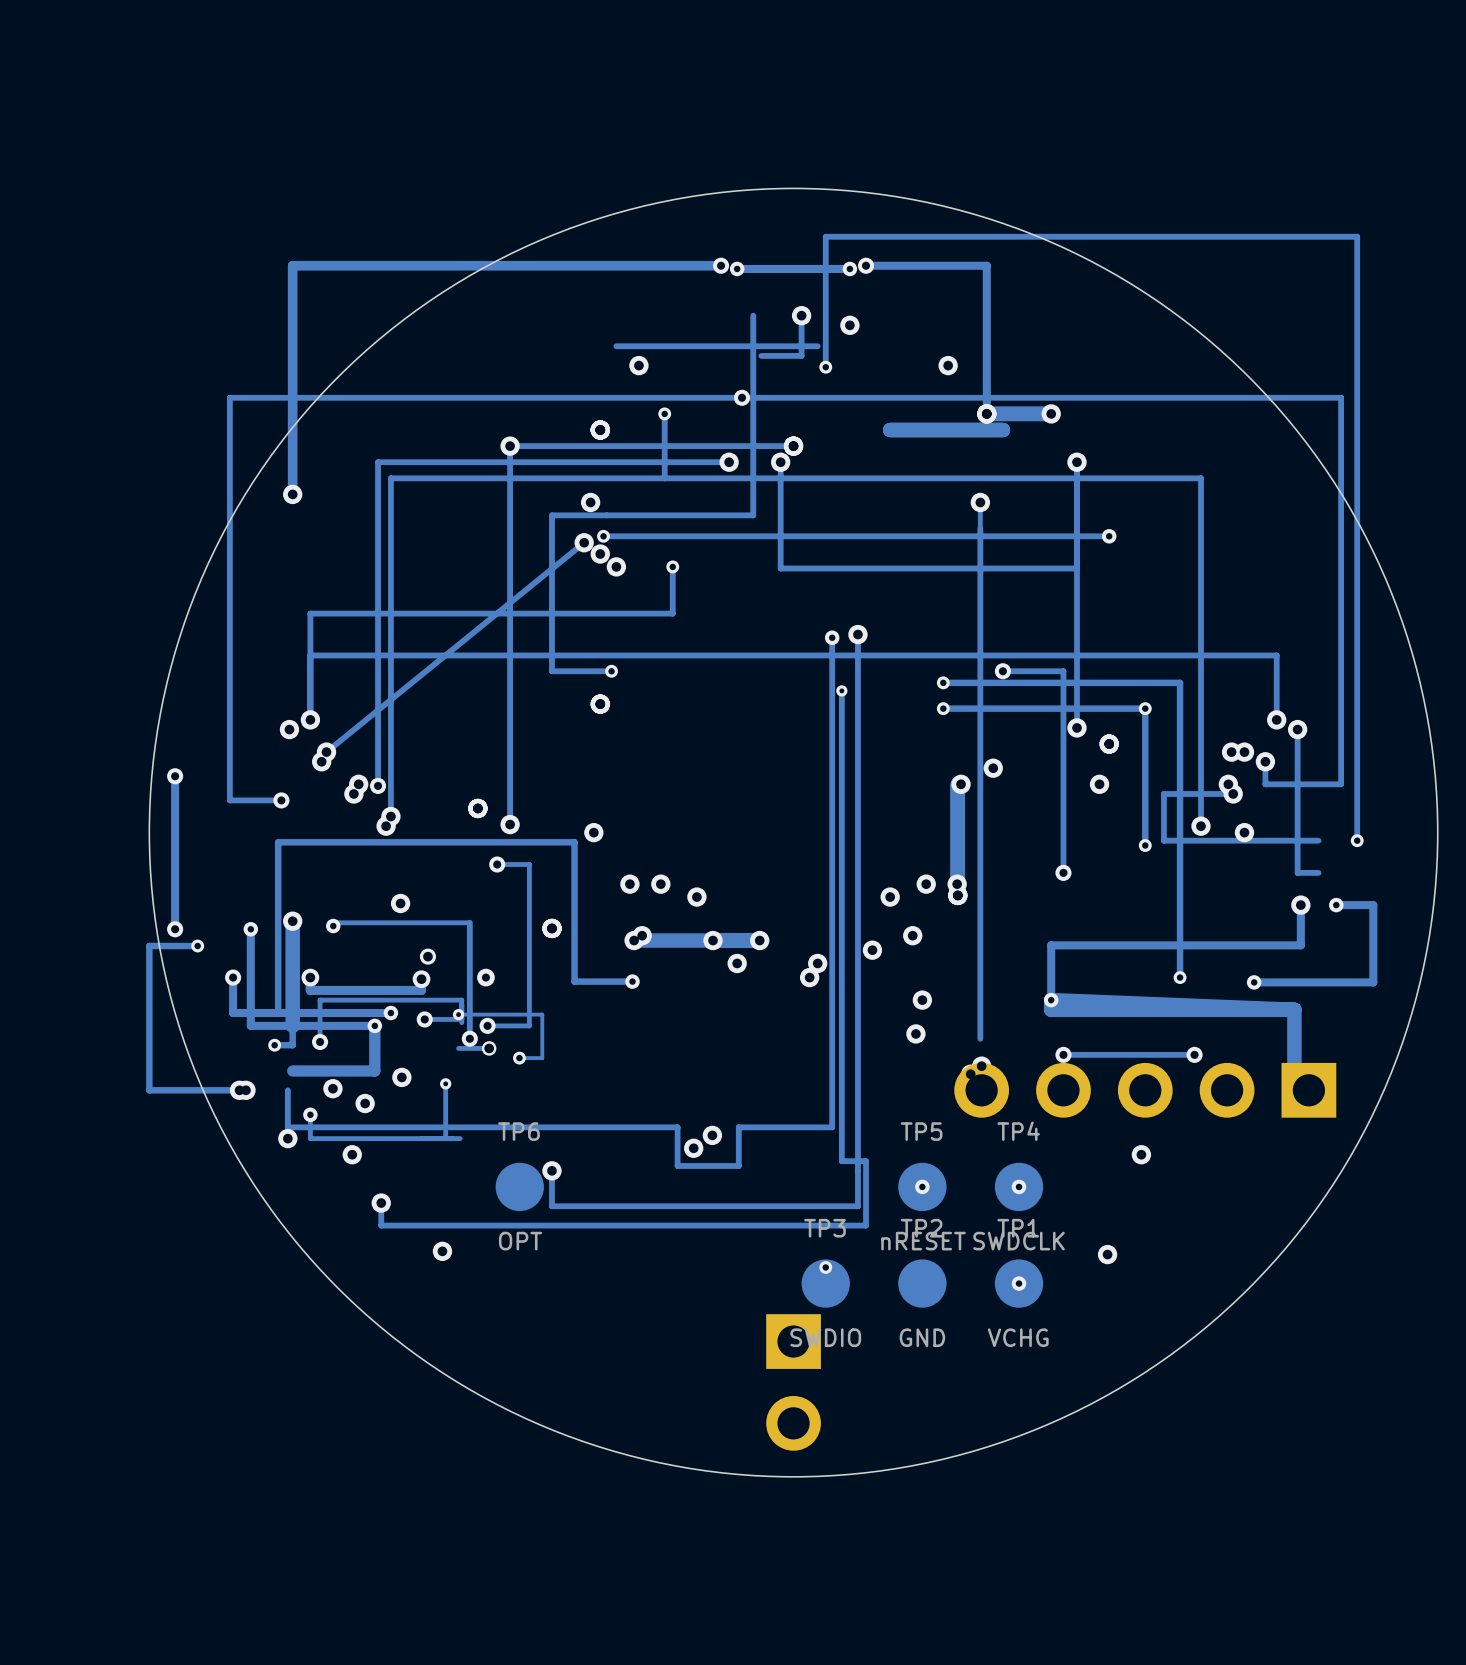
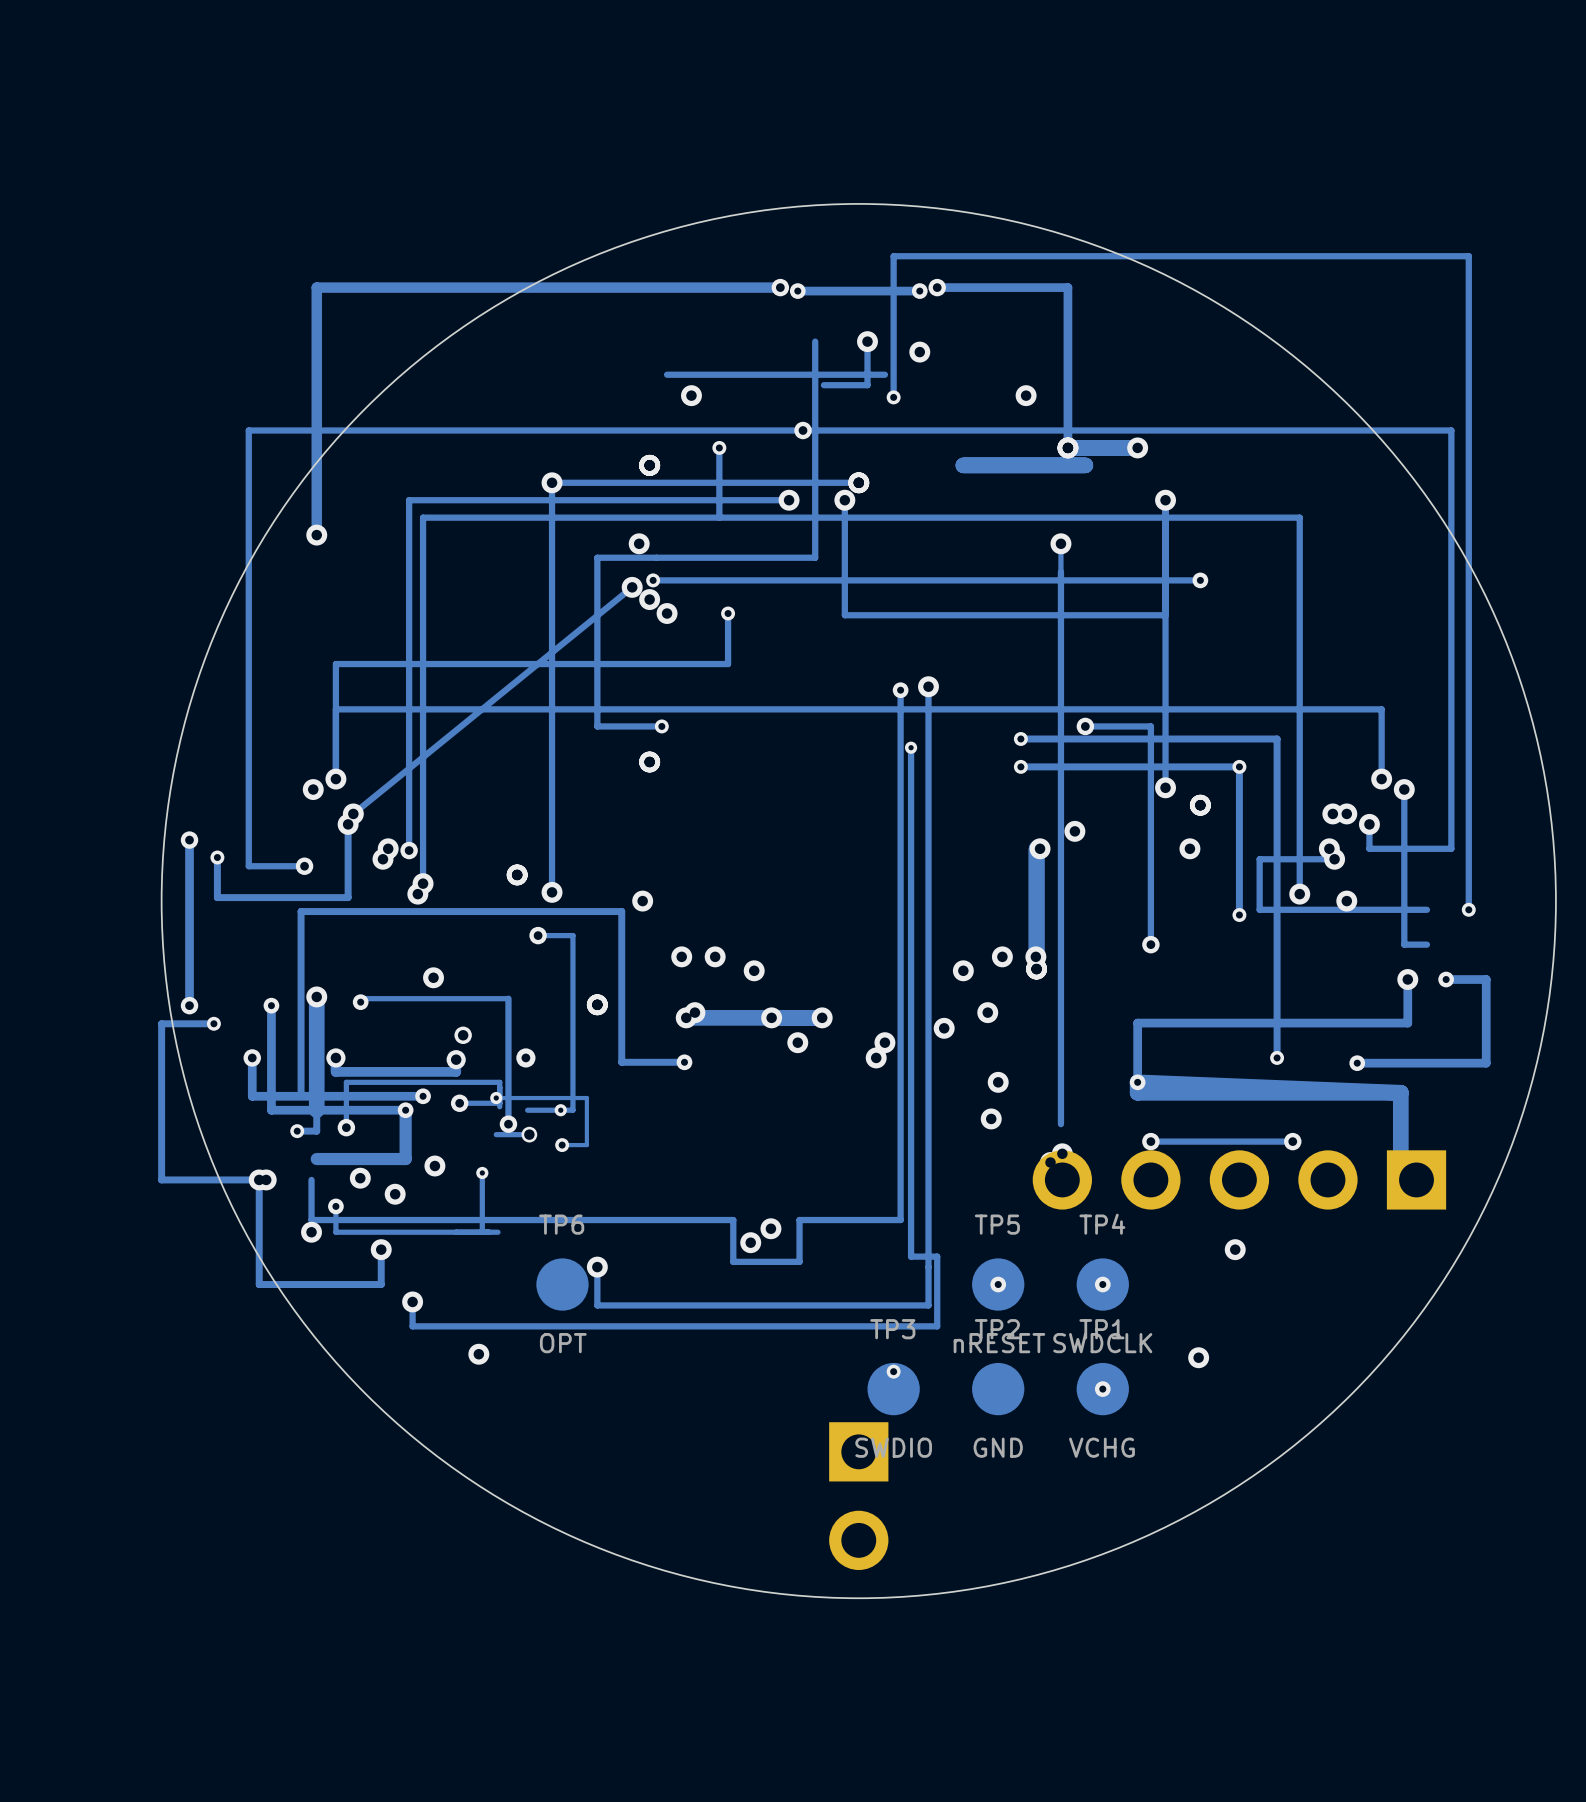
track: none -> (348, 824) (348, 897) (217, 897) (217, 857)
via: none -> (217, 857)
via: (487, 1025) -> none
via: none -> (560, 1110)
track: none -> (259, 1179) (259, 1284) (381, 1284) (381, 1249)

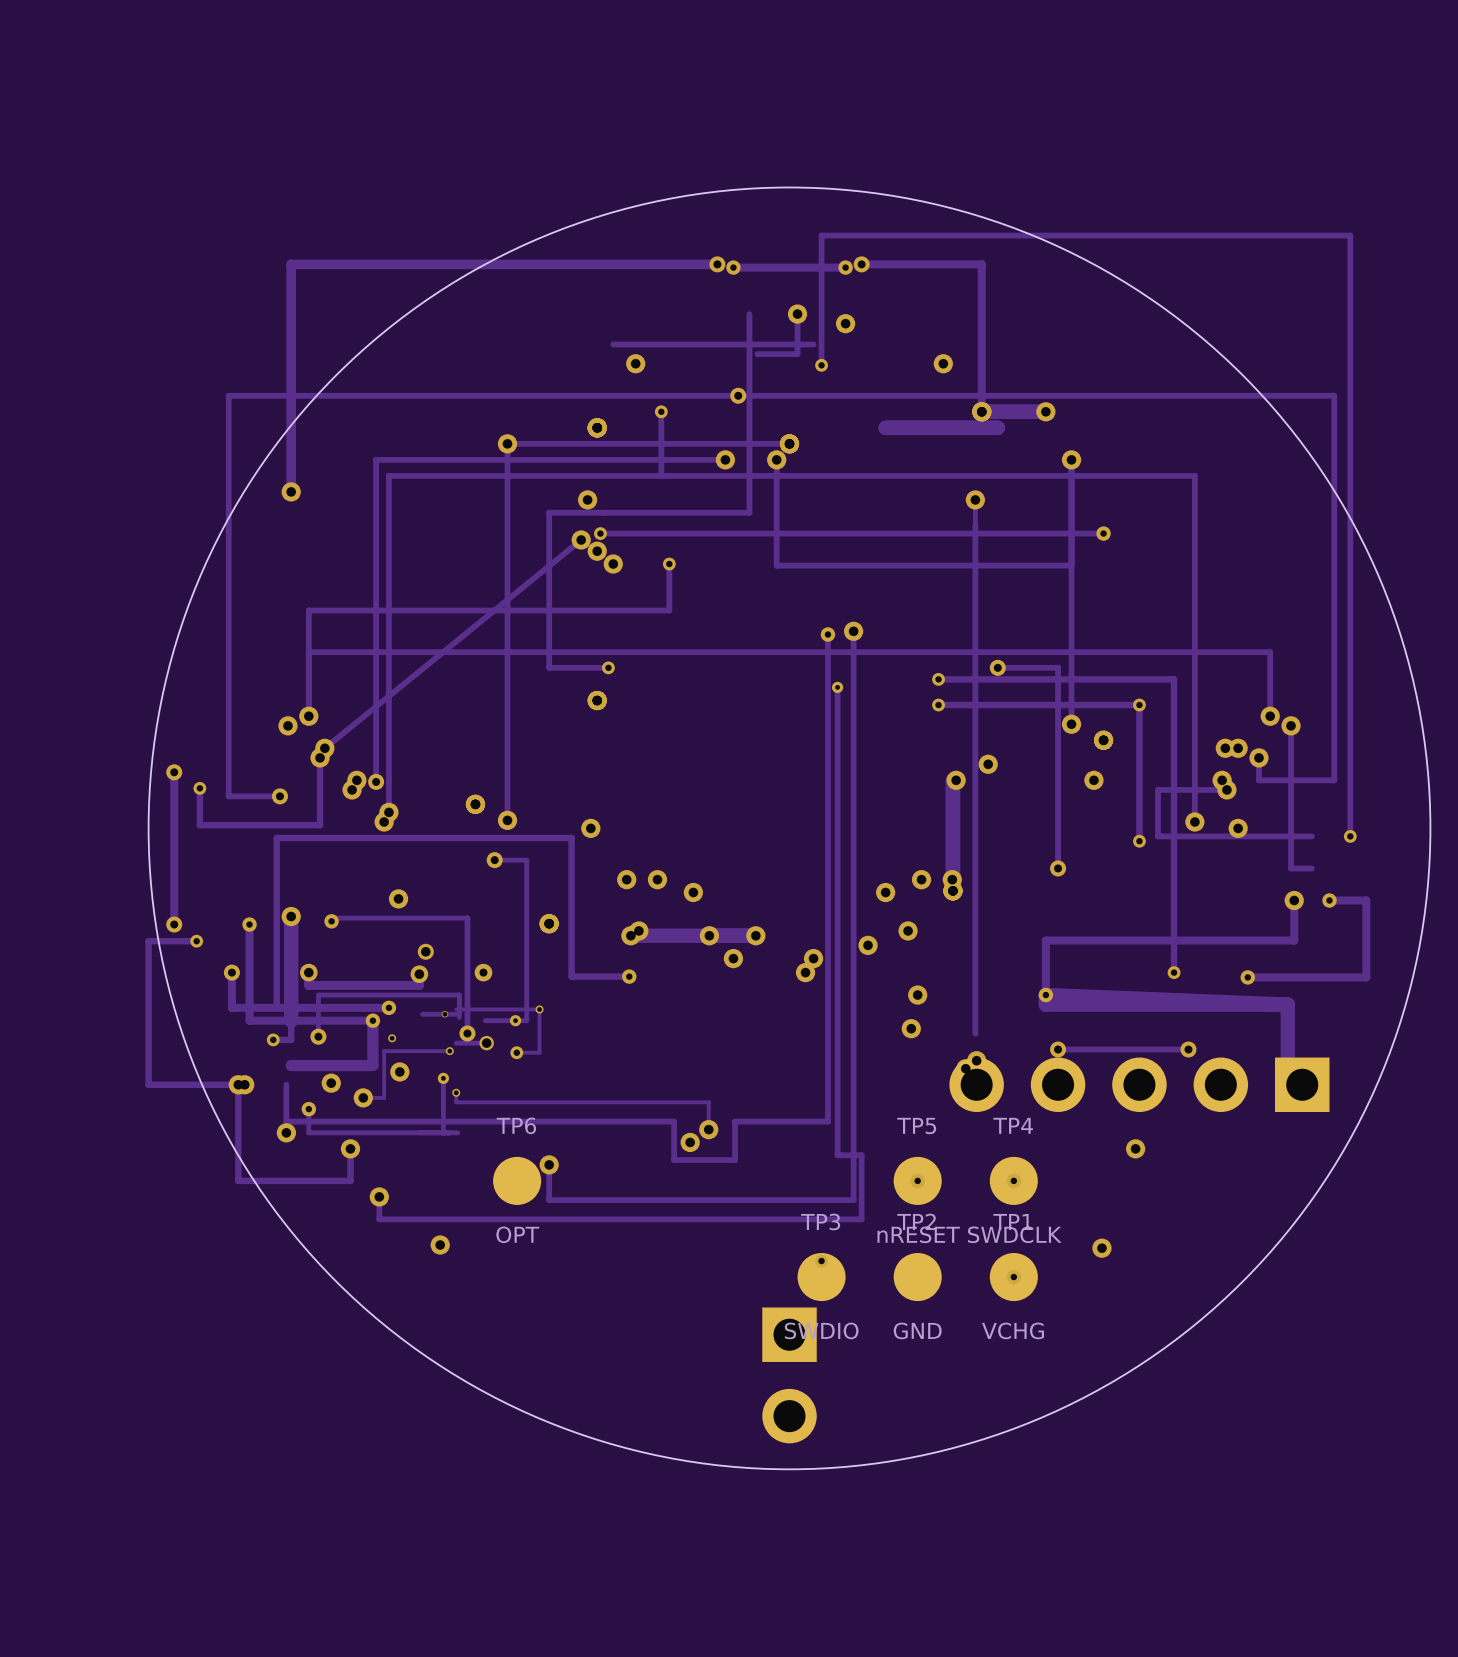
via: (496, 1098) -> none
via: none -> (539, 1009)
via: (459, 1103) -> none
via: none -> (445, 1014)
via: none -> (392, 1038)
track: none -> (449, 1051) (384, 1051) (384, 1097) (363, 1097)
via: none -> (449, 1051)
track: none -> (456, 1092) (456, 1102) (708, 1102) (708, 1129)
via: none -> (456, 1092)

